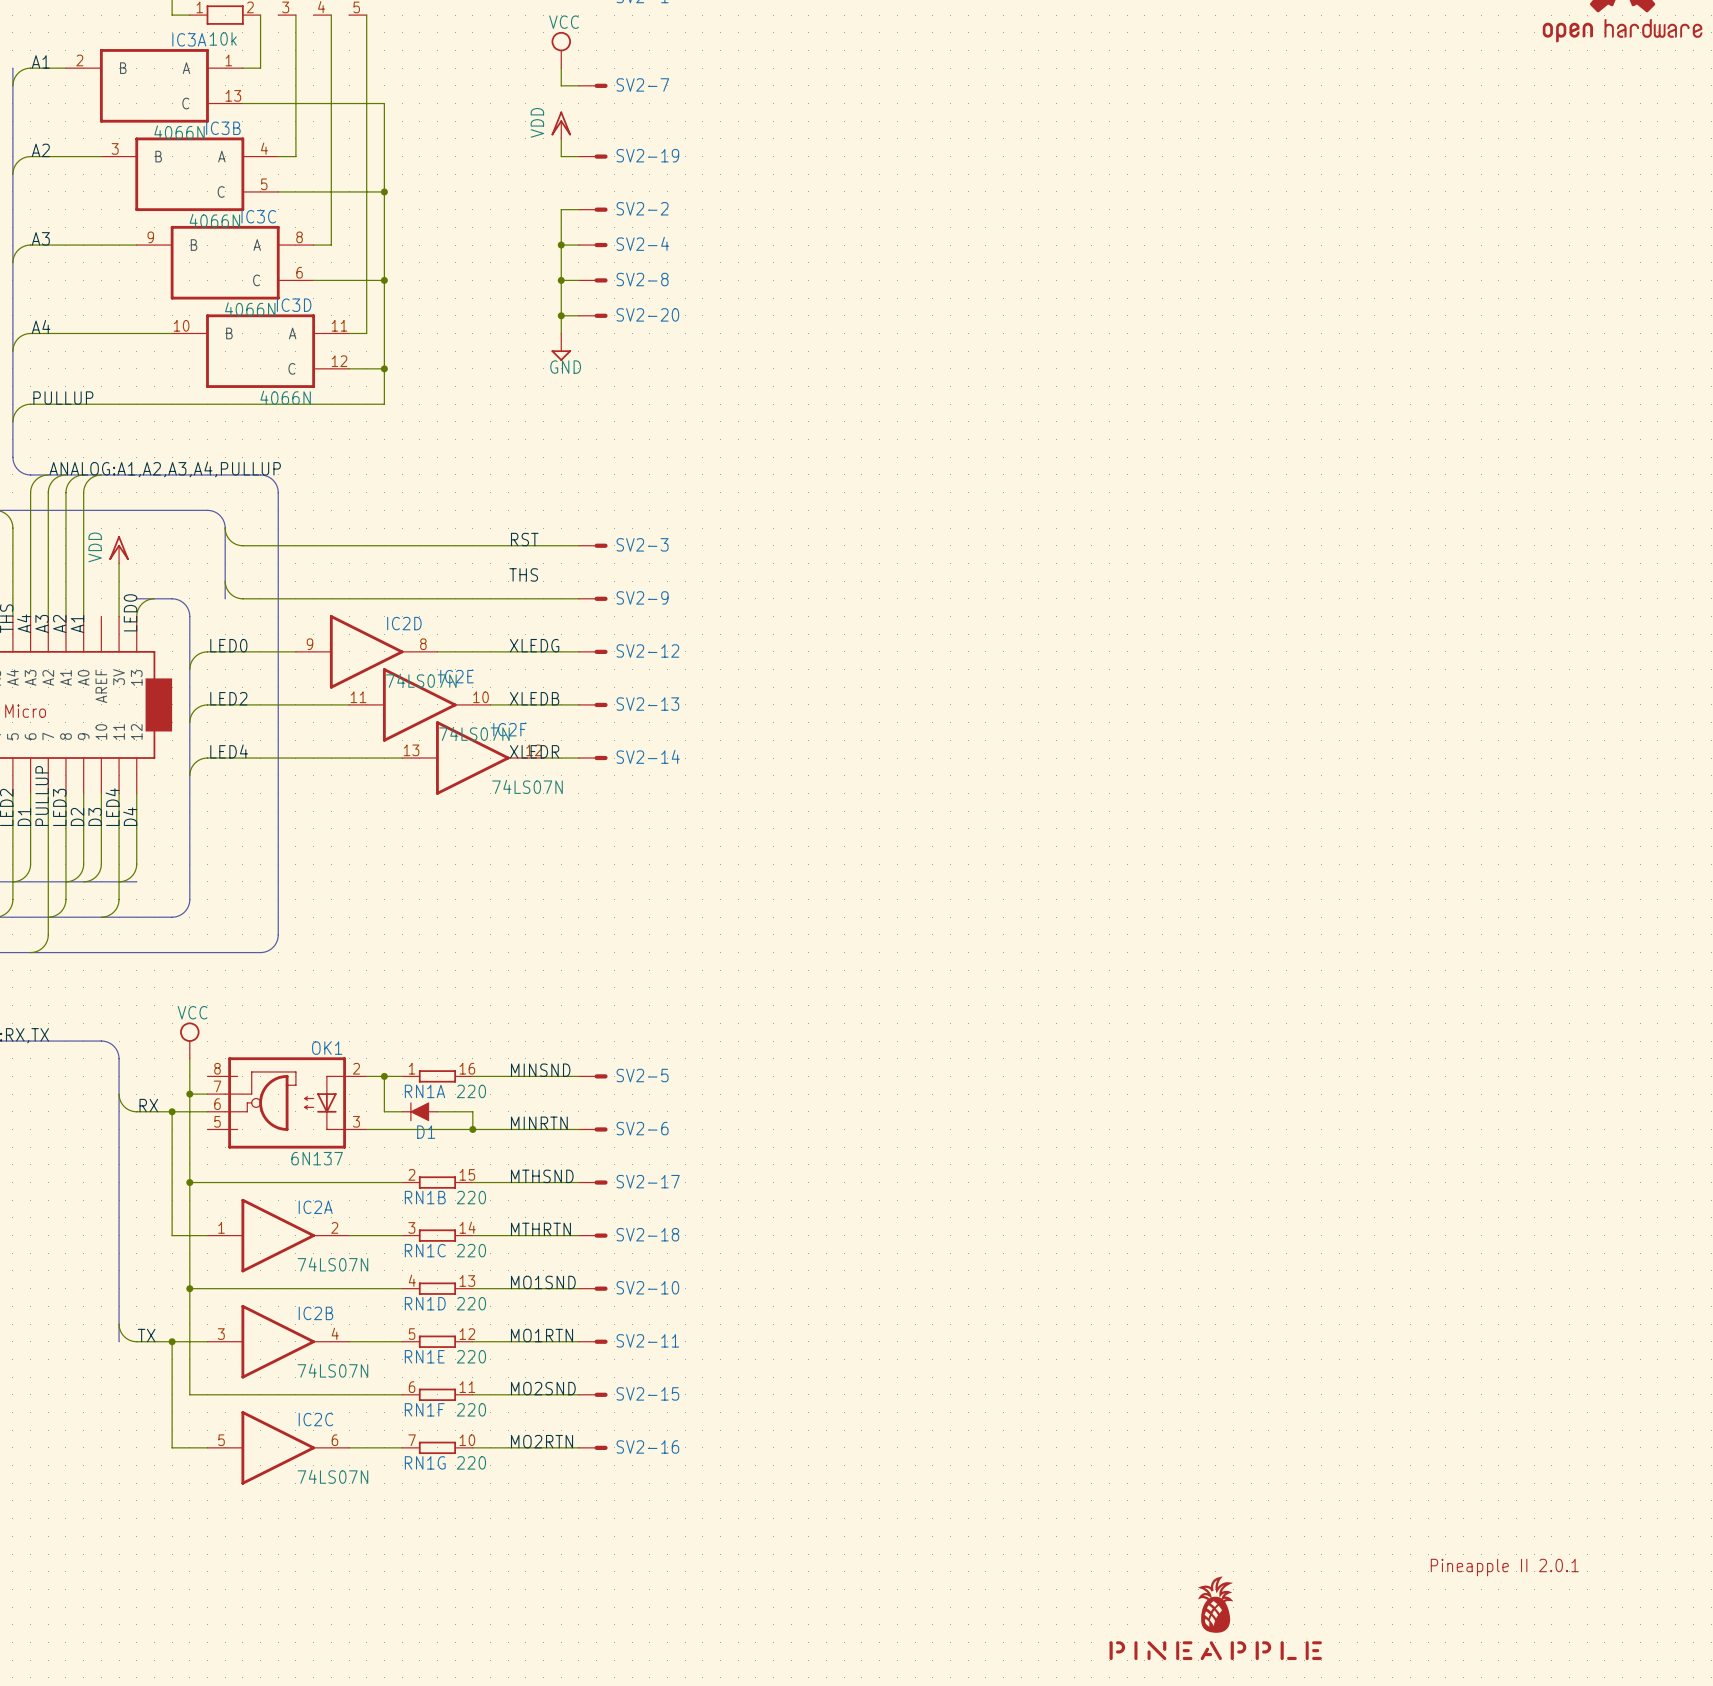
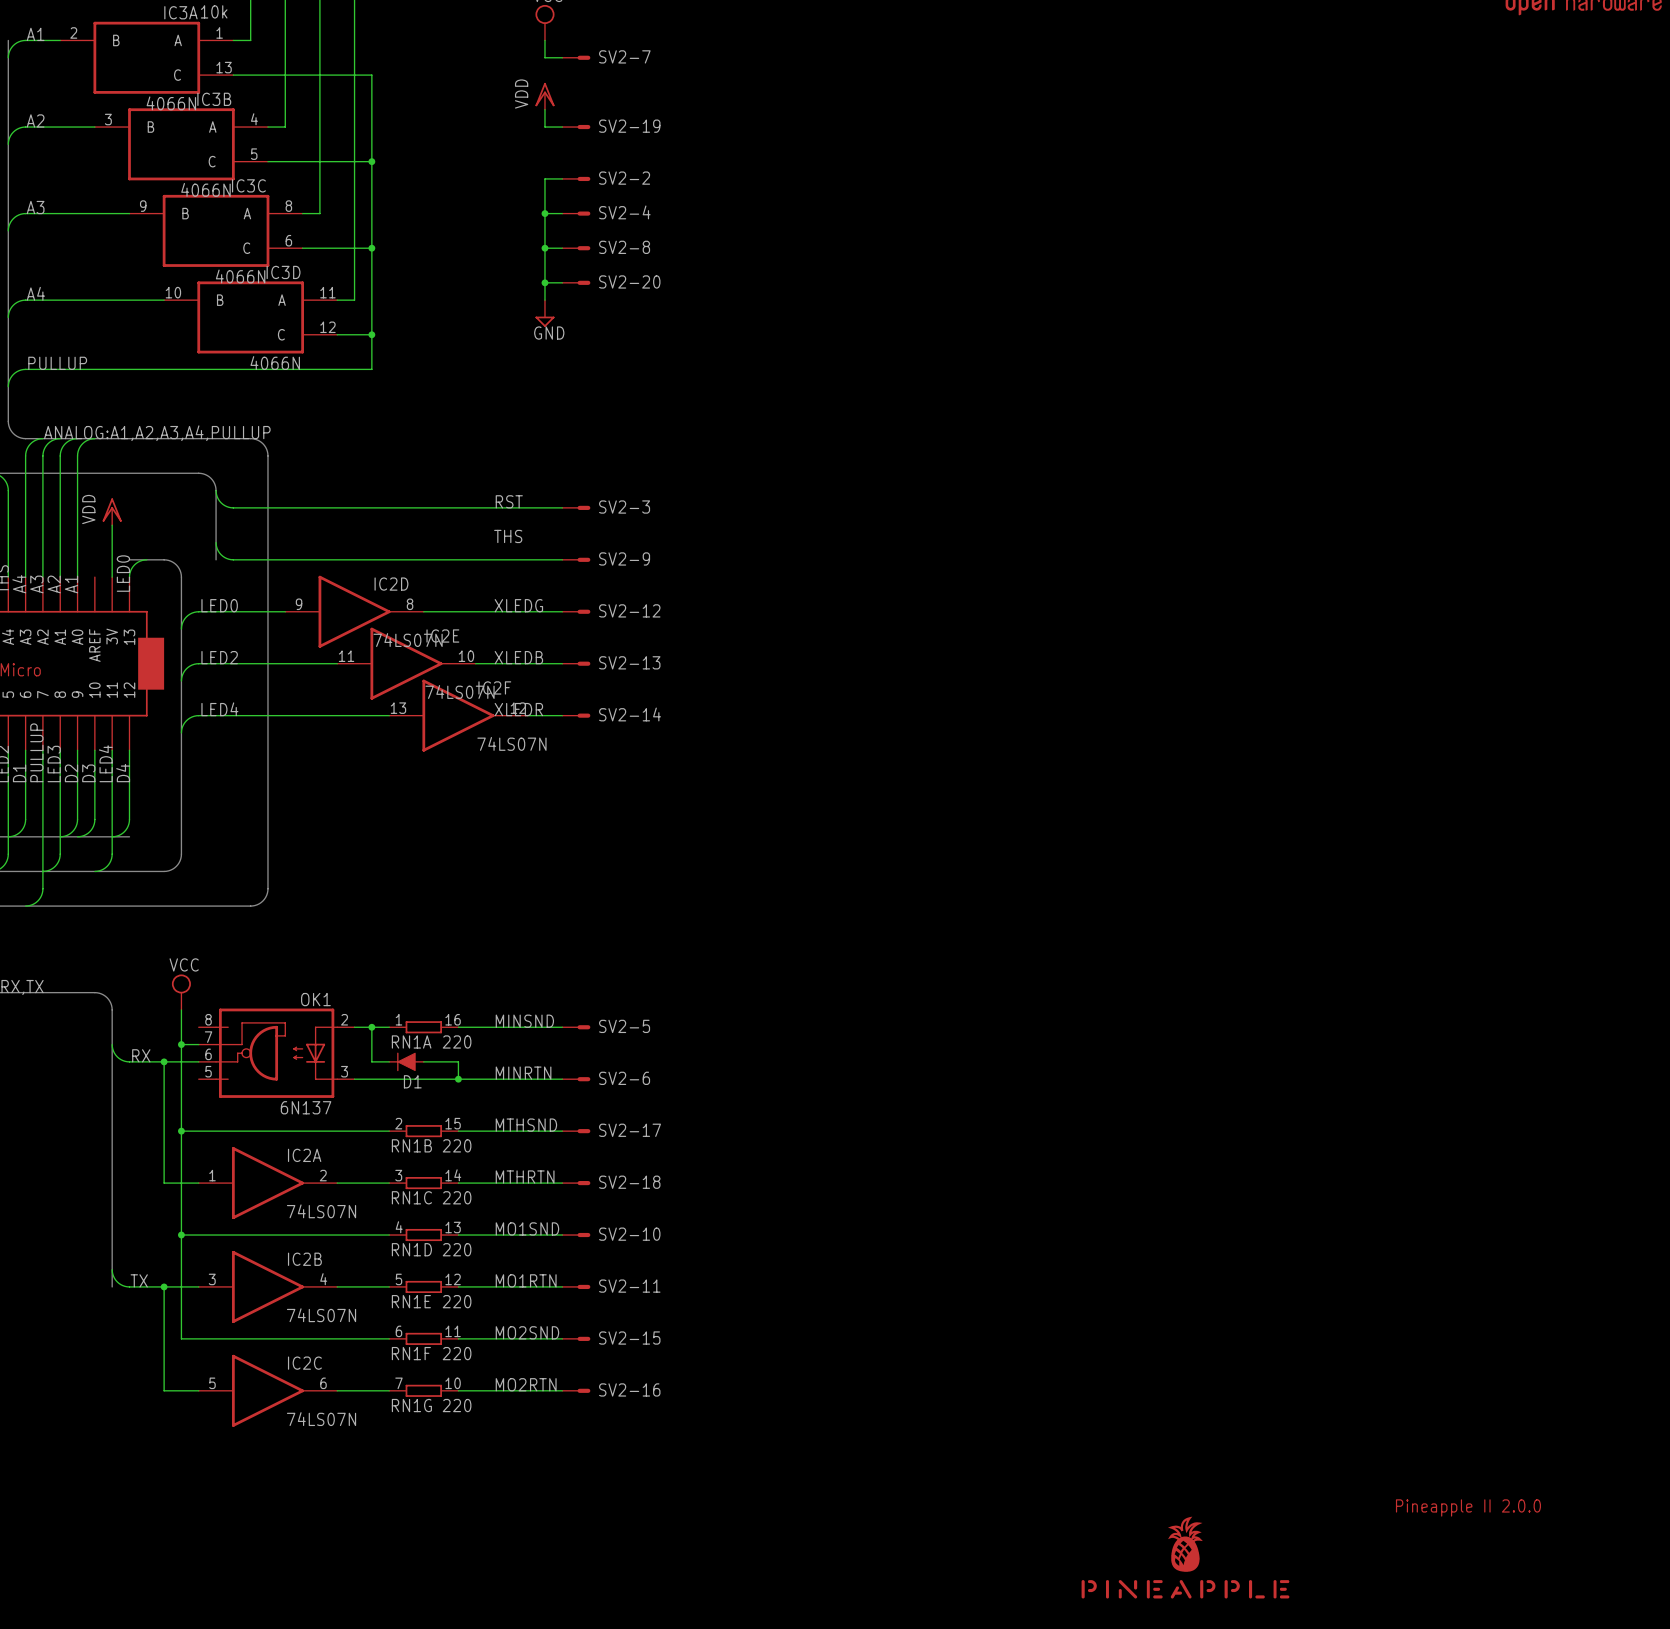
text: Pineapple II 2.0.1 (1504, 1567) -> Pineapple II 2.0.0 (1468, 1507)

